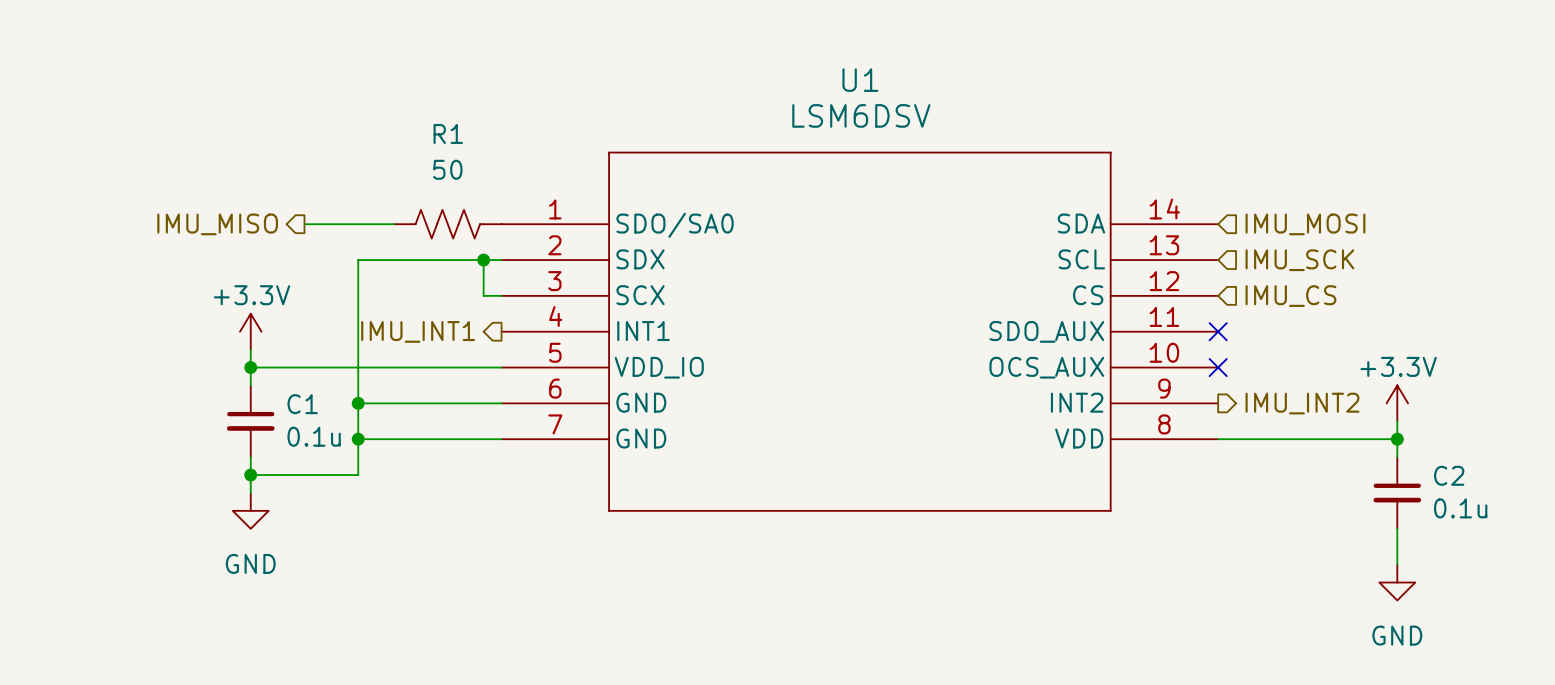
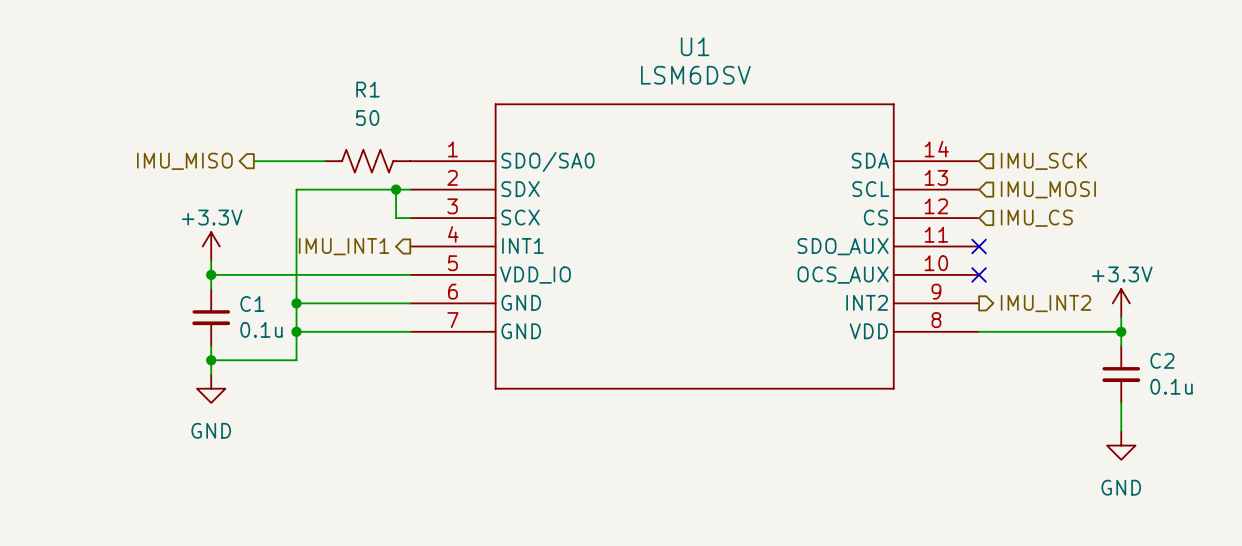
hierarchical label: IMU_MOSI (1305, 224) -> IMU_SCK (1043, 161)
hierarchical label: IMU_SCK (1299, 260) -> IMU_MOSI (1048, 189)

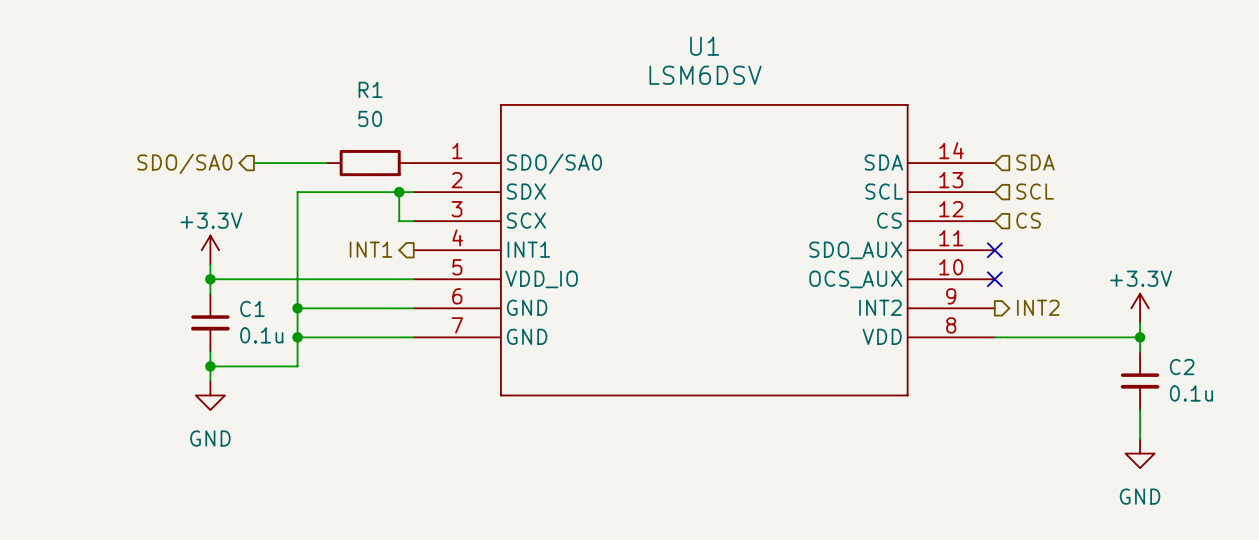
R1 symbol: [324, 149, 411, 173] -> [326, 149, 414, 177]
hierarchical label: IMU_MISO (184, 161) -> SDO/SA0 (184, 163)
hierarchical label: IMU_SCK (1043, 161) -> SDA (1035, 162)
hierarchical label: IMU_MOSI (1048, 189) -> SCL (1035, 191)
hierarchical label: IMU_CS (1036, 218) -> CS (1028, 220)
hierarchical label: IMU_INT1 (344, 246) -> INT1 (370, 249)
hierarchical label: IMU_INT2 (1045, 303) -> INT2 (1038, 307)

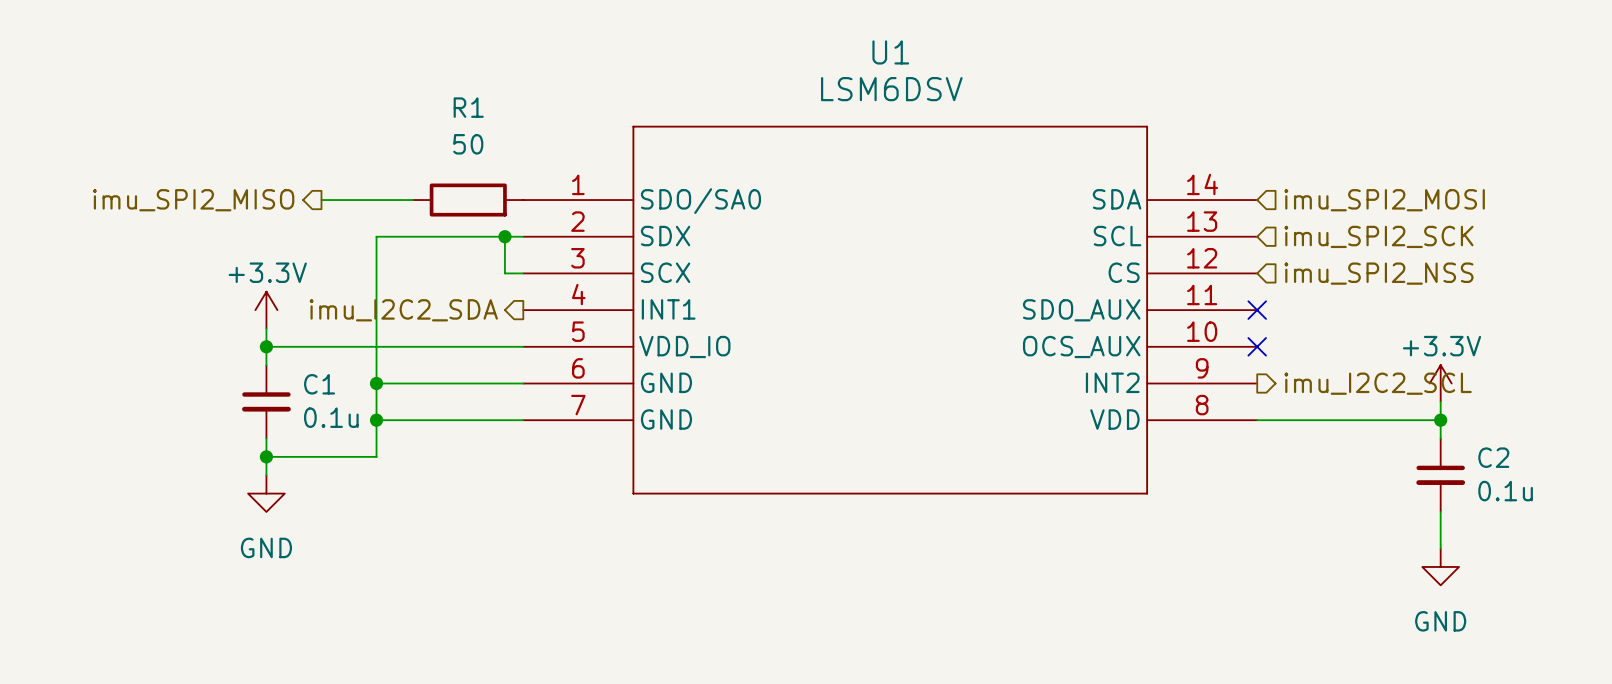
hierarchical label: SDA (1035, 162) -> imu_SPI2_MOSI (1384, 200)
hierarchical label: SDO/SA0 (184, 163) -> imu_SPI2_MISO (193, 200)
hierarchical label: SCL (1035, 191) -> imu_SPI2_SCK (1378, 236)
hierarchical label: CS (1028, 220) -> imu_SPI2_NSS (1378, 273)
hierarchical label: INT1 (370, 249) -> imu_I2C2_SDA (403, 310)
hierarchical label: INT2 (1038, 307) -> imu_I2C2_SCL (1378, 383)

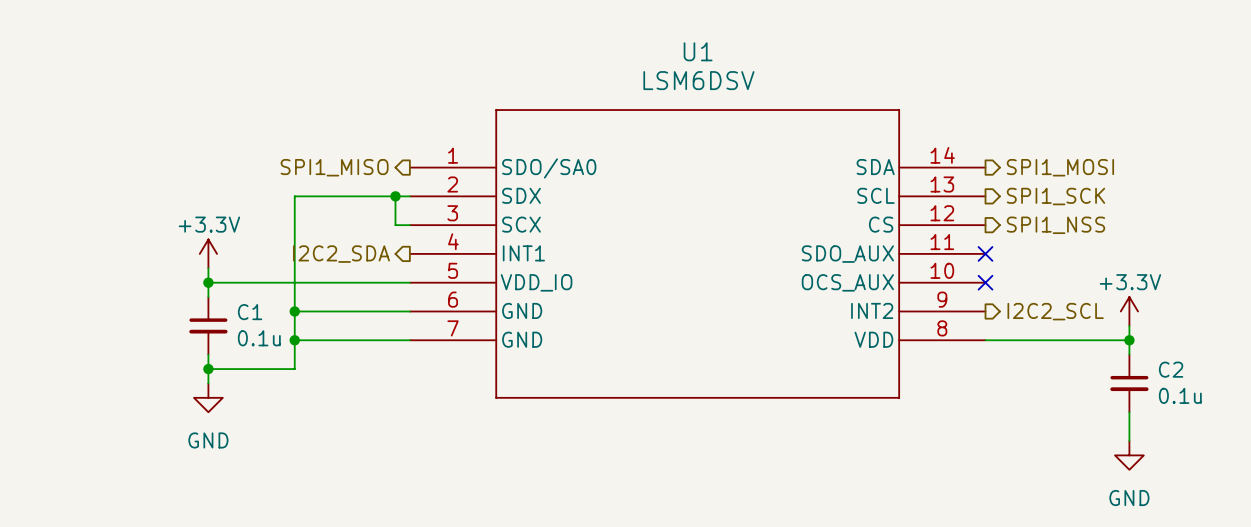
hierarchical label: imu_SPI2_MISO (193, 200) -> none
wire: (321, 200) (413, 200) -> none
hierarchical label: none -> SPI1_MISO (334, 167)
R1: 50 (468, 200) -> none
hierarchical label shape: input (1384, 200) -> output (1060, 167)
hierarchical label: imu_SPI2_MOSI (1384, 200) -> SPI1_MOSI (1060, 167)
hierarchical label shape: input (1378, 236) -> output (1055, 196)
hierarchical label: imu_SPI2_SCK (1378, 236) -> SPI1_SCK (1055, 196)
hierarchical label shape: input (1378, 273) -> output (1055, 225)
hierarchical label: imu_SPI2_NSS (1378, 273) -> SPI1_NSS (1055, 225)
hierarchical label: imu_I2C2_SDA (403, 310) -> I2C2_SDA (341, 254)
hierarchical label: imu_I2C2_SCL (1378, 383) -> I2C2_SCL (1055, 311)

